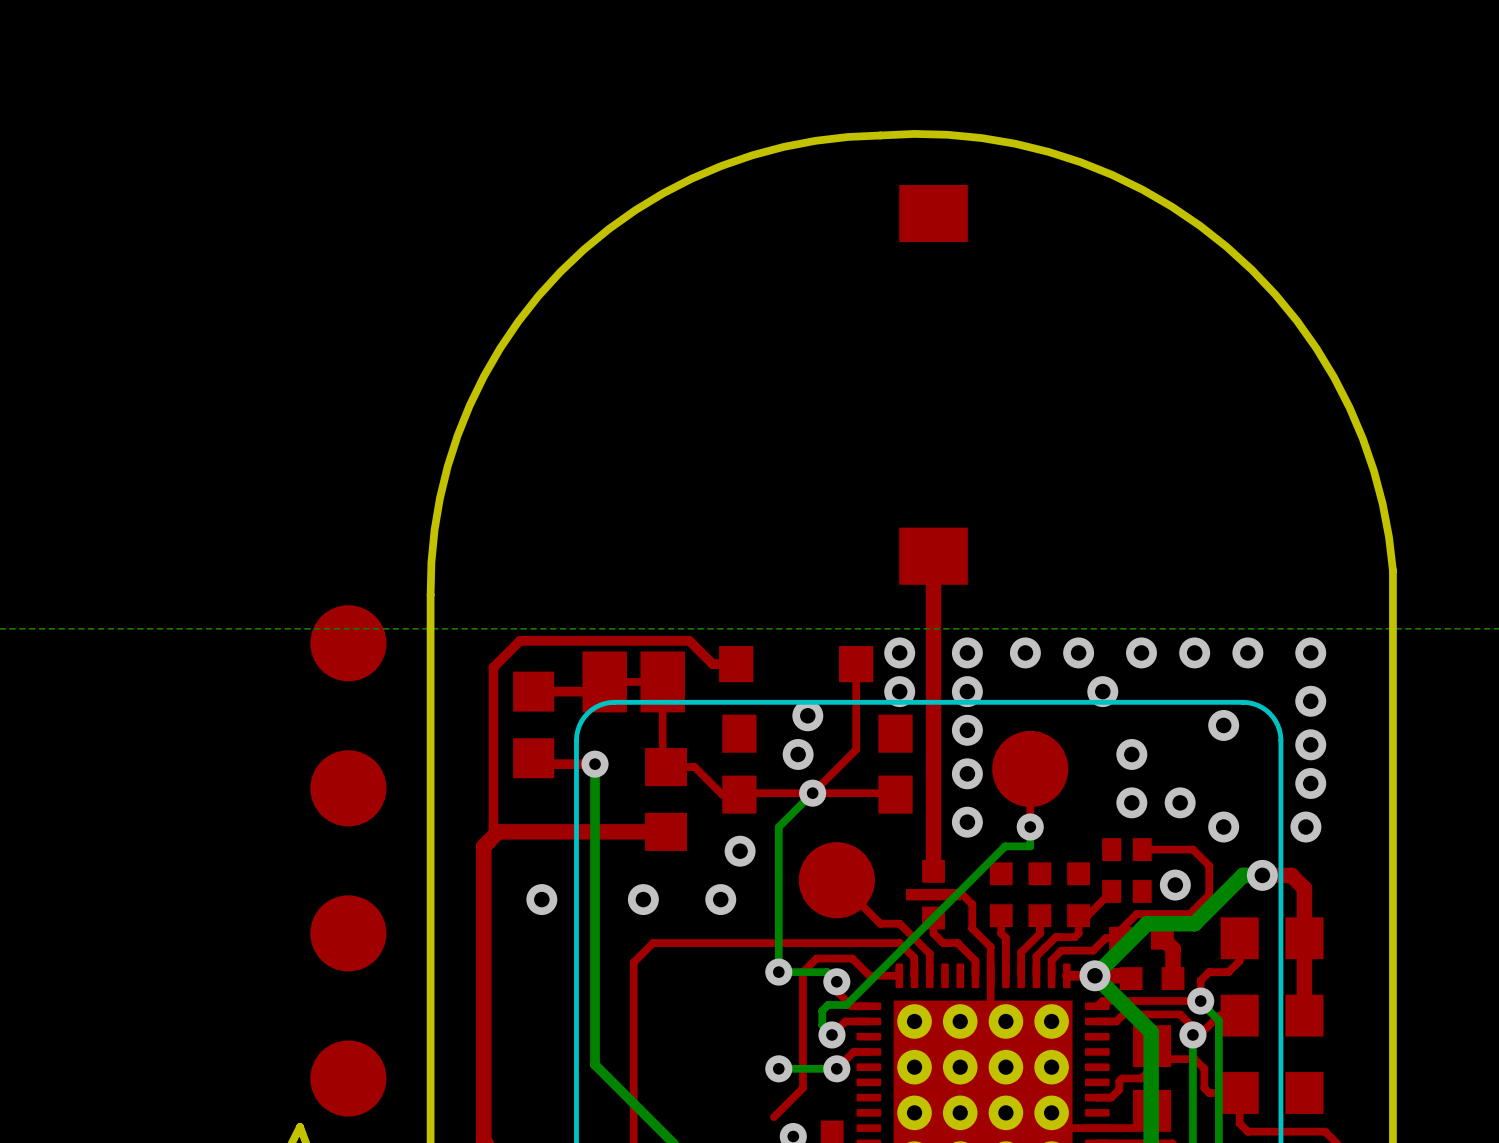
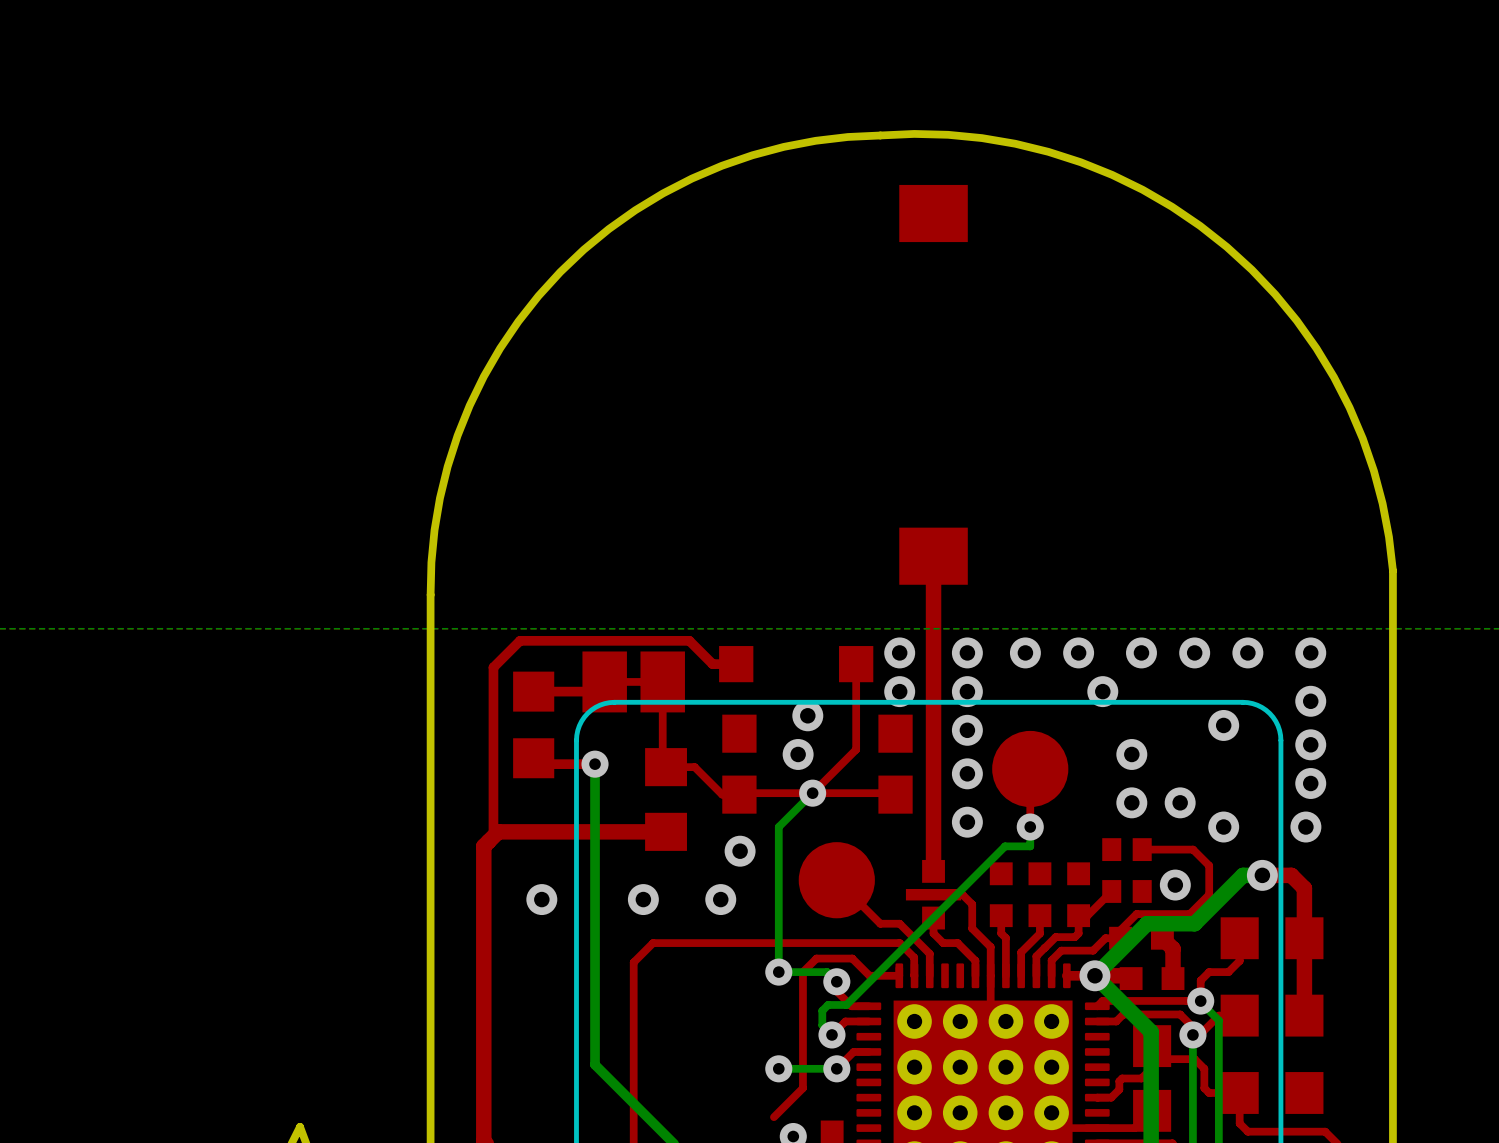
part: (348, 643) -> none
part: (348, 788) -> none
part: (348, 933) -> none
part: (348, 1078) -> none

